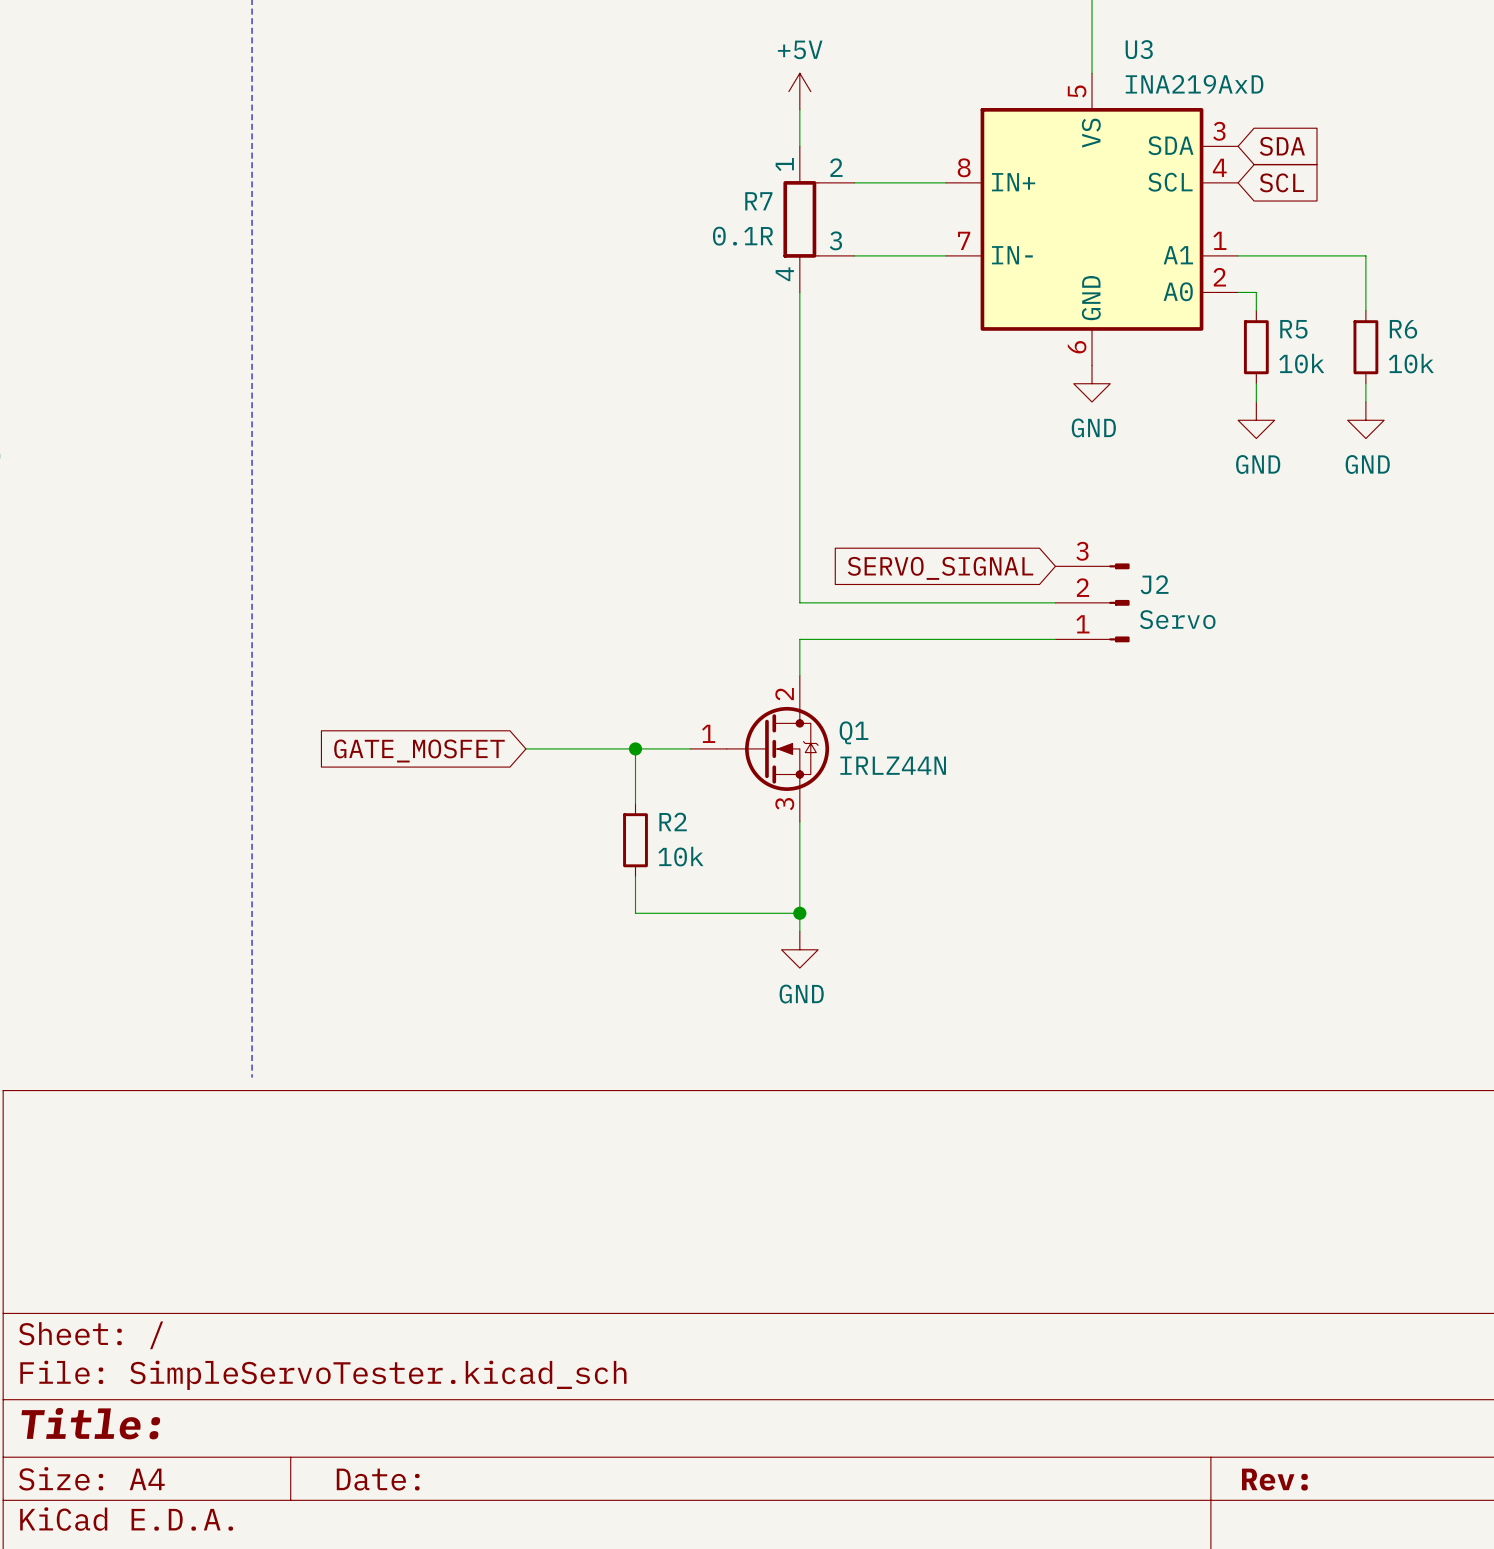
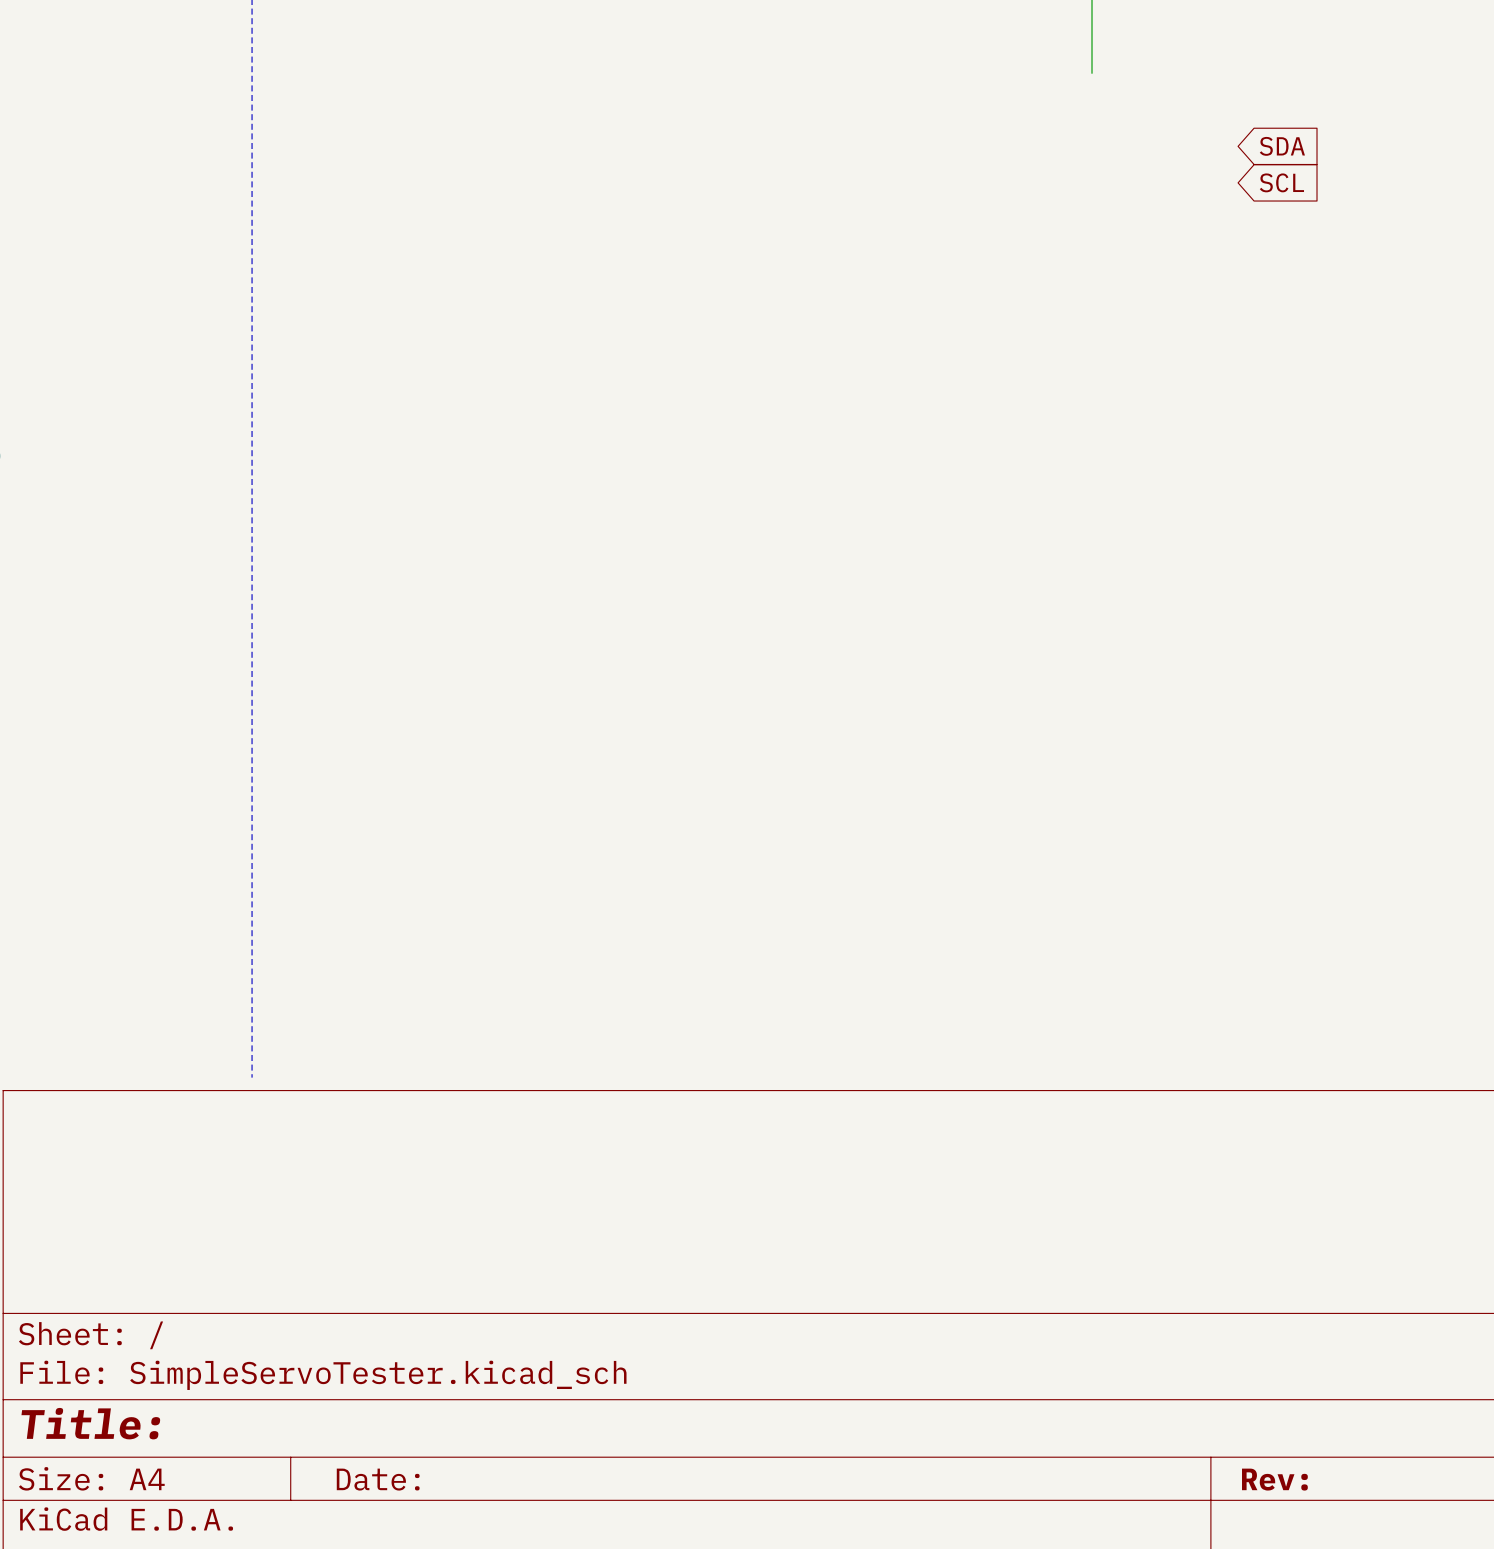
power symbol: +5V (799, 91) -> none
wire: (799, 109) (799, 146) -> none
wire: (854, 182) (945, 182) -> none
R7: 0.1R (819, 219) -> none
U3: INA219AxD (1092, 219) -> none
wire: (854, 255) (945, 255) -> none
wire: (1238, 255) (1365, 255) (1365, 310) -> none
wire: (799, 292) (799, 602) (1055, 602) -> none
wire: (1238, 292) (1256, 292) (1256, 310) -> none
R5: 10k (1256, 347) -> none
R6: 10k (1365, 347) -> none
power symbol: GND (1092, 383) -> none
wire: (1256, 383) (1256, 402) -> none
wire: (1365, 383) (1365, 402) -> none
power symbol: GND (1256, 420) -> none
power symbol: GND (1365, 420) -> none
global label: SERVO_SIGNAL (940, 568) -> none
J2: Servo (1092, 602) -> none
wire: (1055, 639) (799, 639) (799, 675) -> none
wire: (525, 748) (690, 748) -> none
wire: (635, 748) (635, 803) -> none
junction: (635, 748) -> none
Q1: IRLZ44N (759, 748) -> none
global label: GATE_MOSFET (419, 750) -> none
wire: (799, 821) (799, 931) -> none
R2: 10k (635, 840) -> none
wire: (635, 876) (635, 913) (799, 913) -> none
junction: (799, 913) -> none
power symbol: GND (799, 949) -> none

